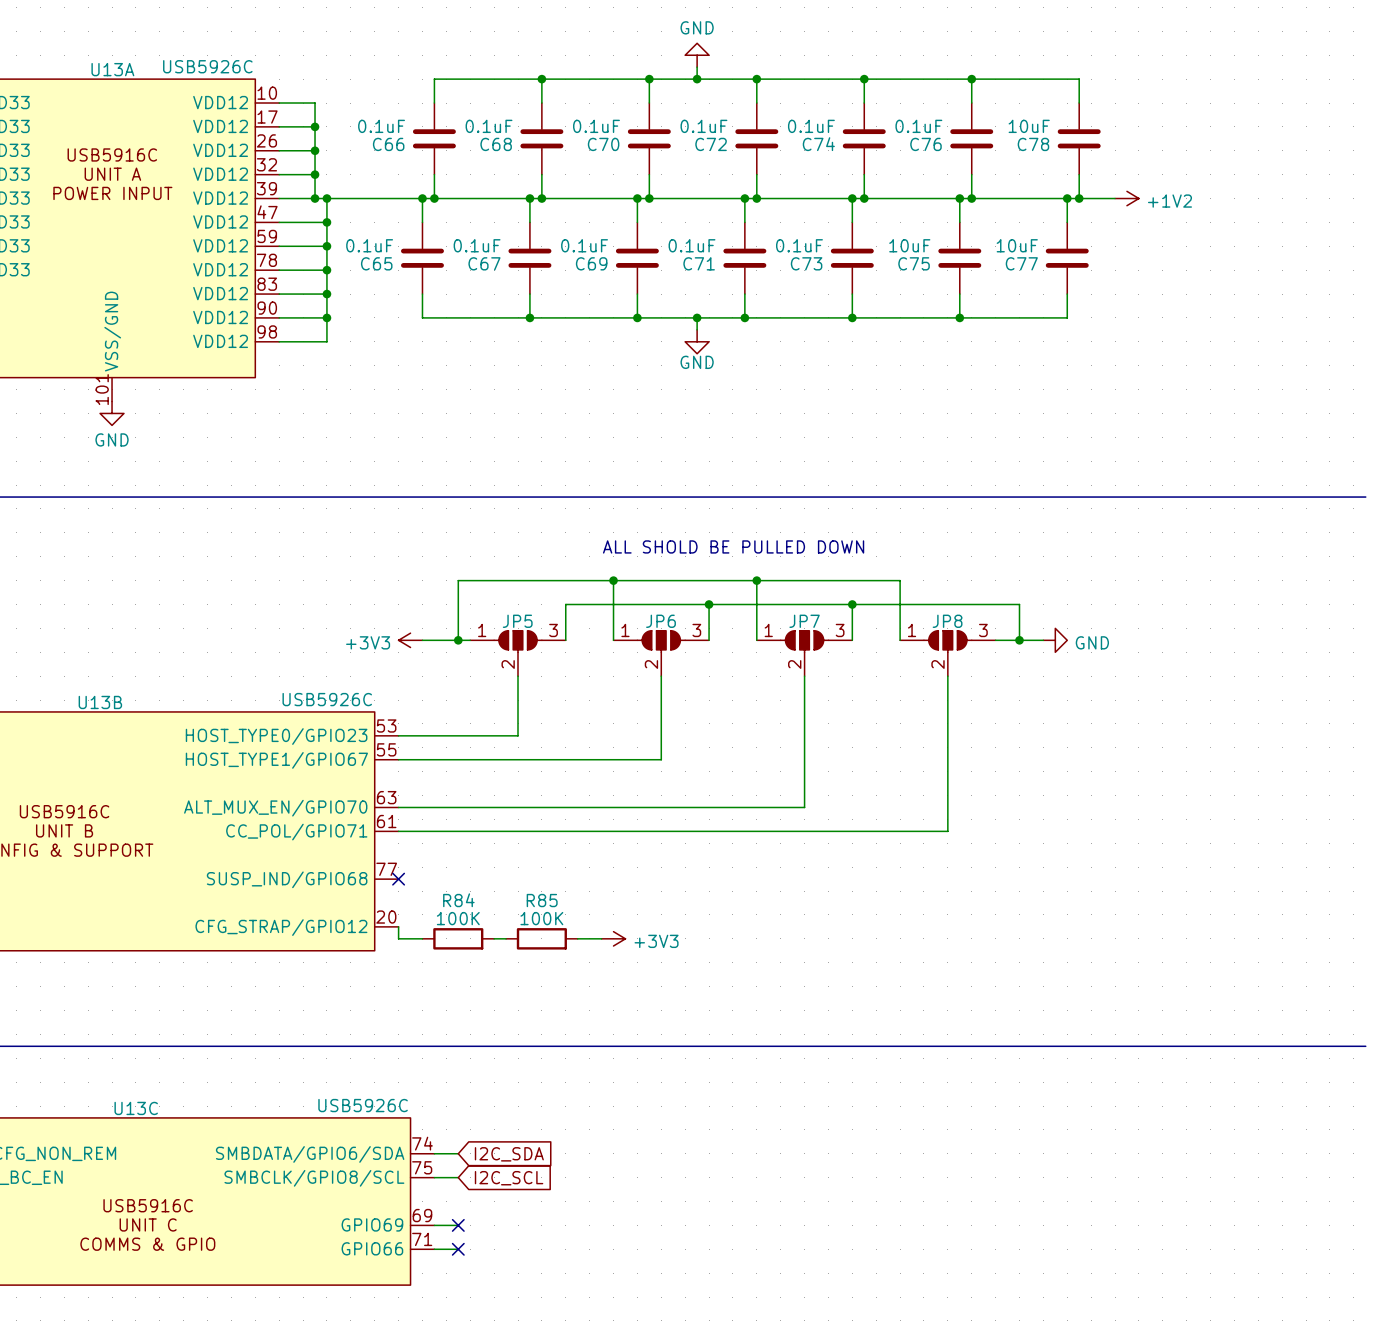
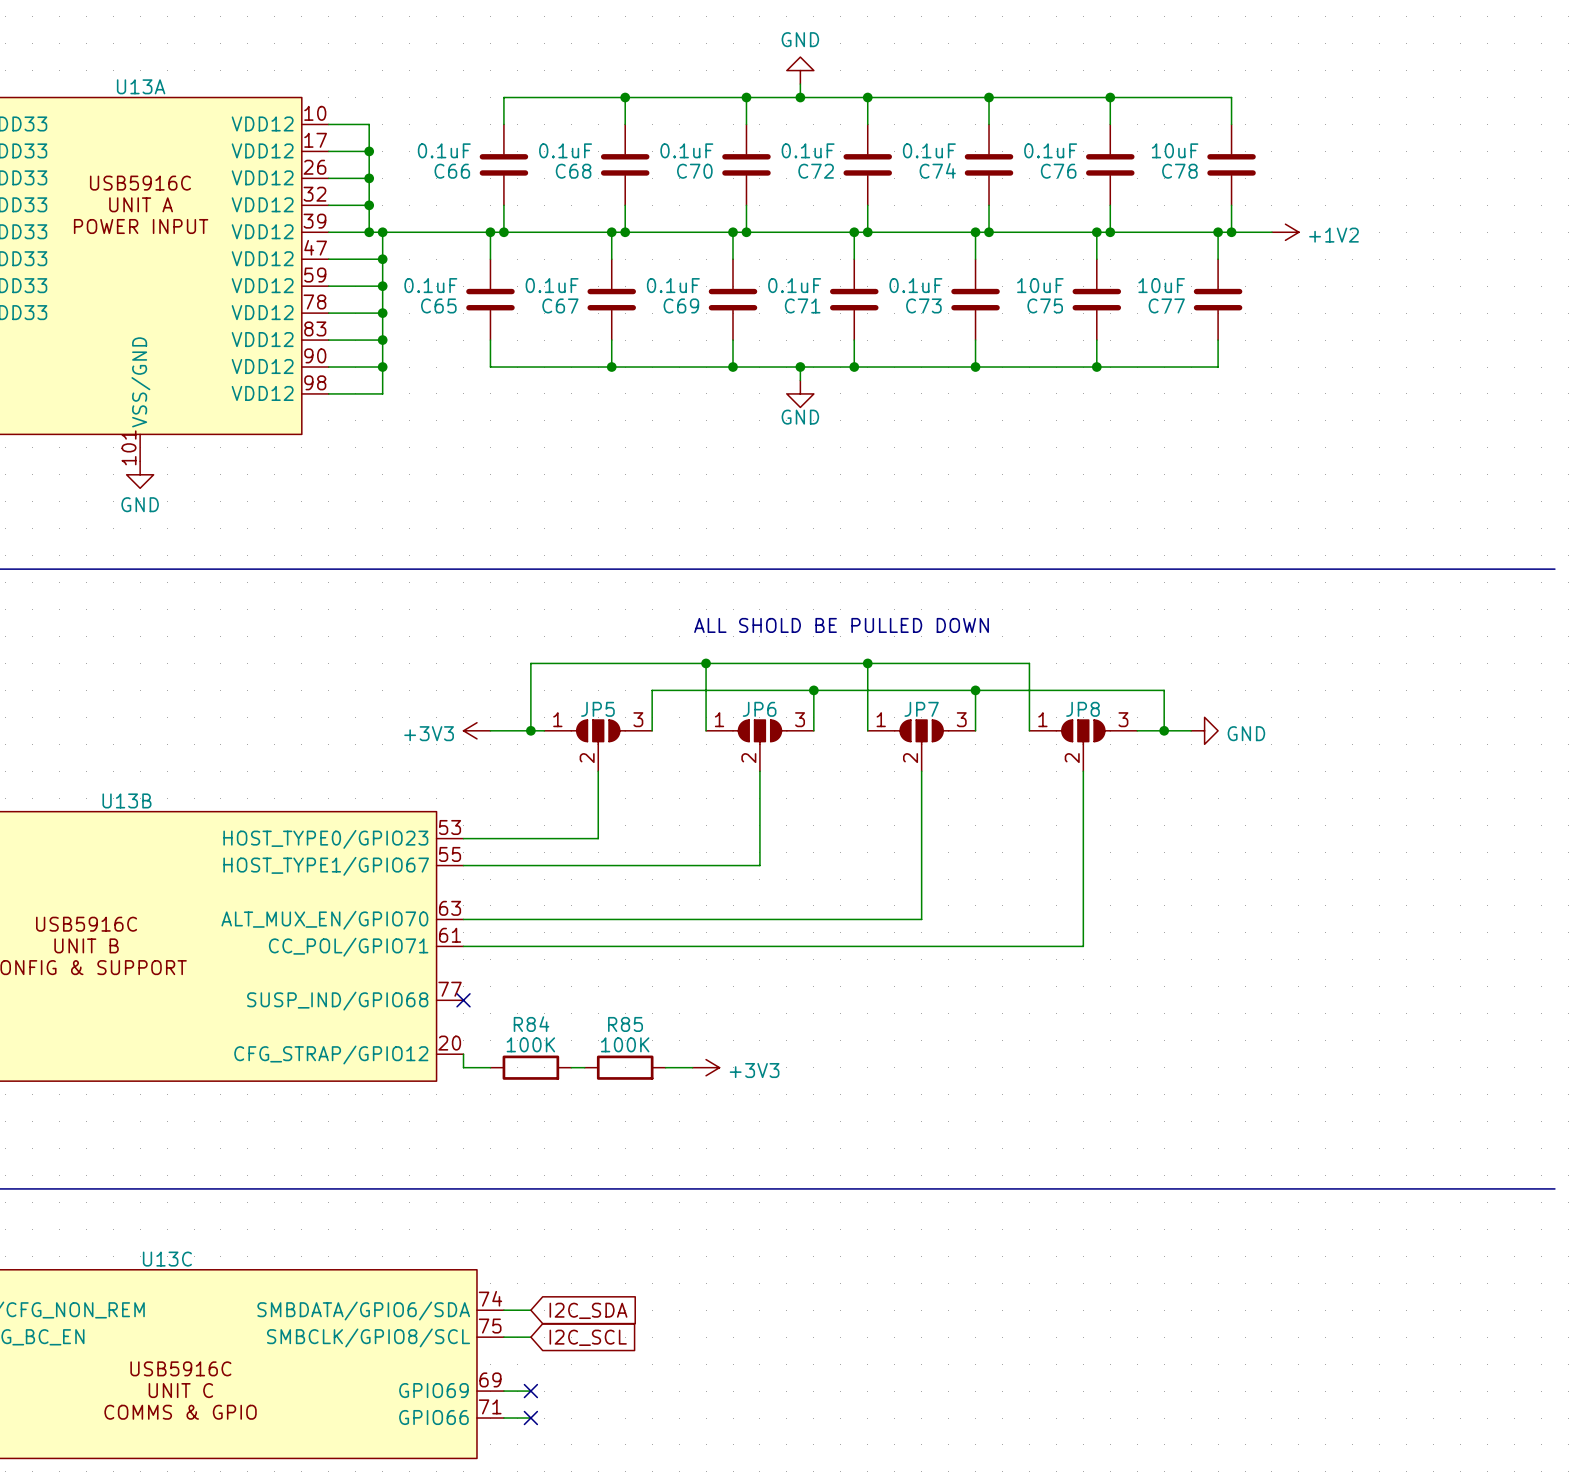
U13A value: USB5926C (207, 66) -> none
U13B value: USB5926C (327, 699) -> none
U13C value: USB5926C (363, 1105) -> none

